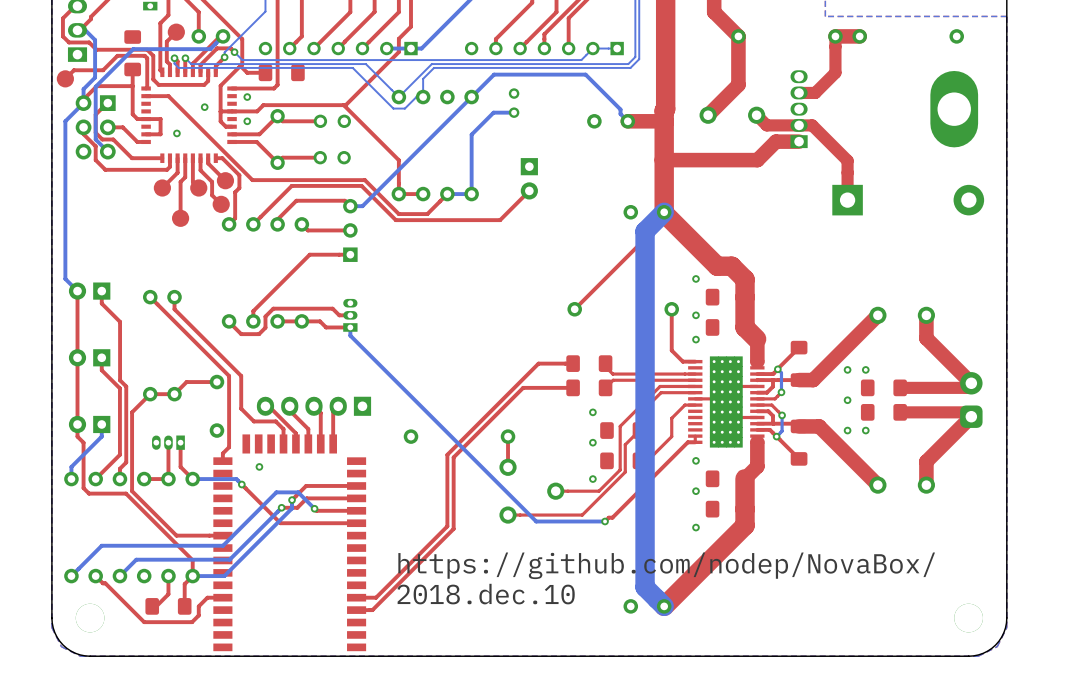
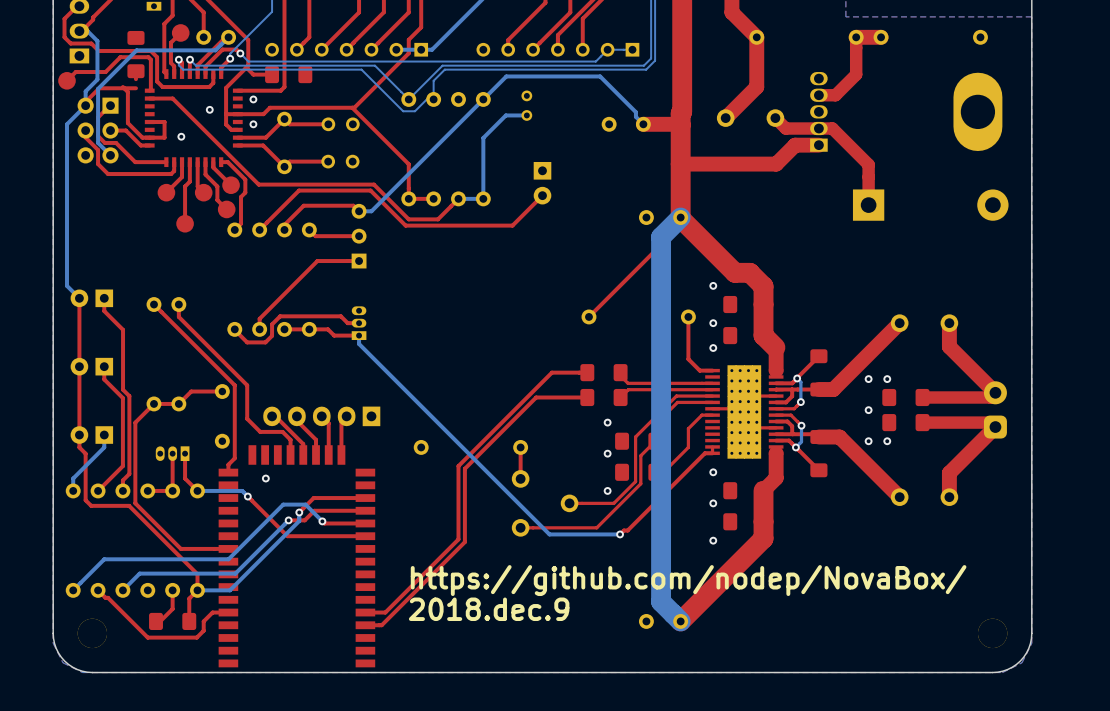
top track: (132, 77) (132, 114) (137, 119) (146, 119) -> none
top track: none -> (122, 87) (127, 92) (127, 123) (142, 137) (149, 137)
text: 2018.dec.10 (486, 594) -> 2018.dec.9 (489, 609)

